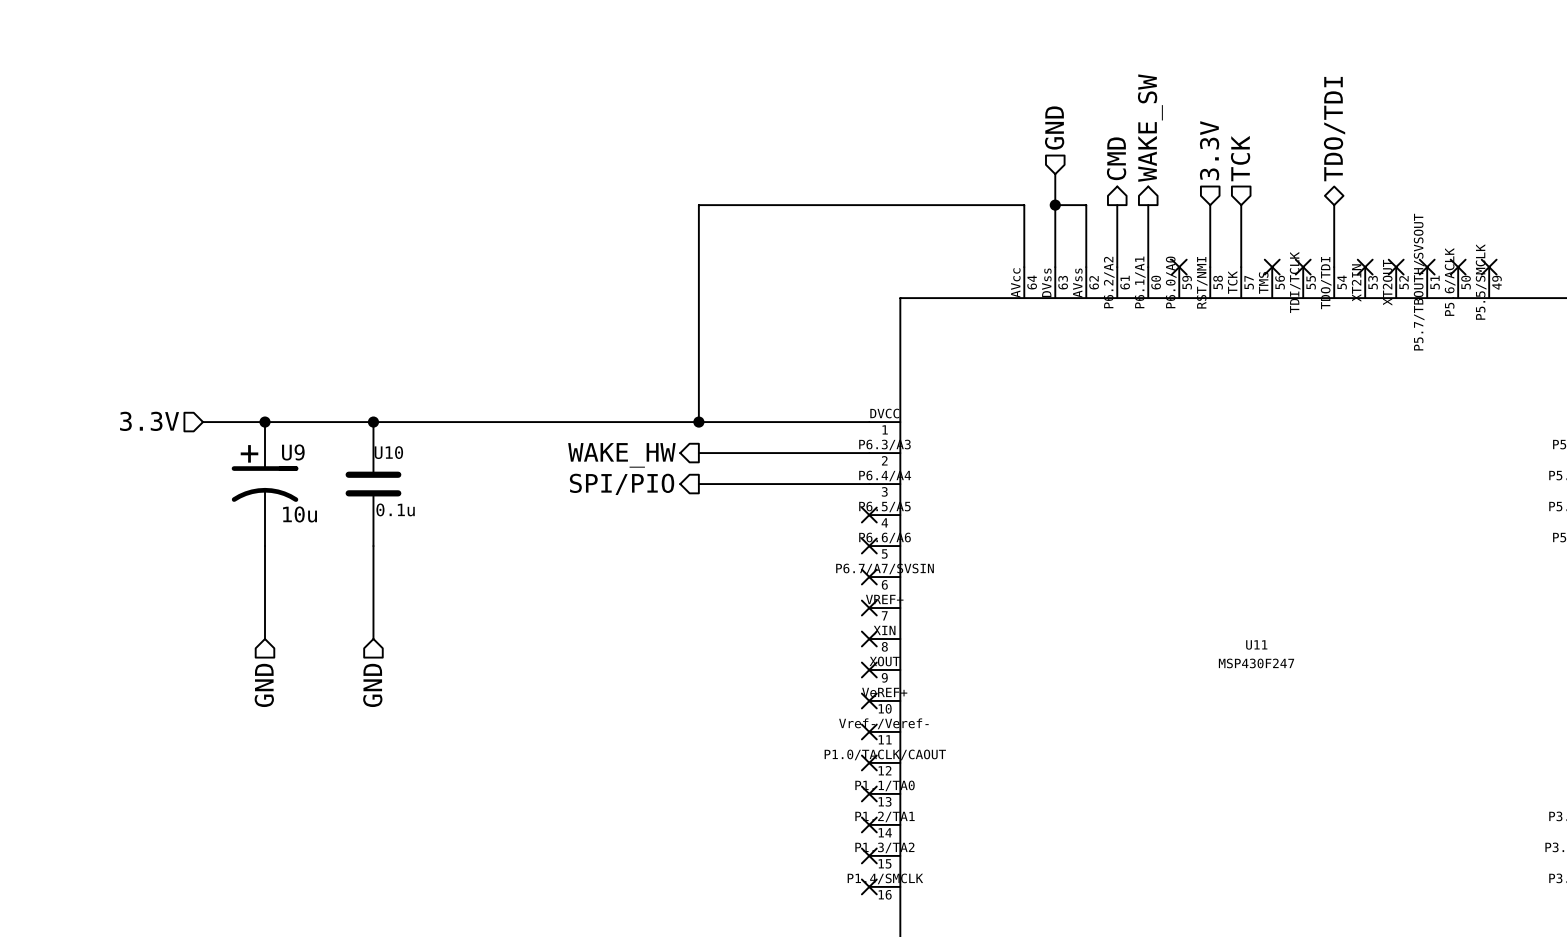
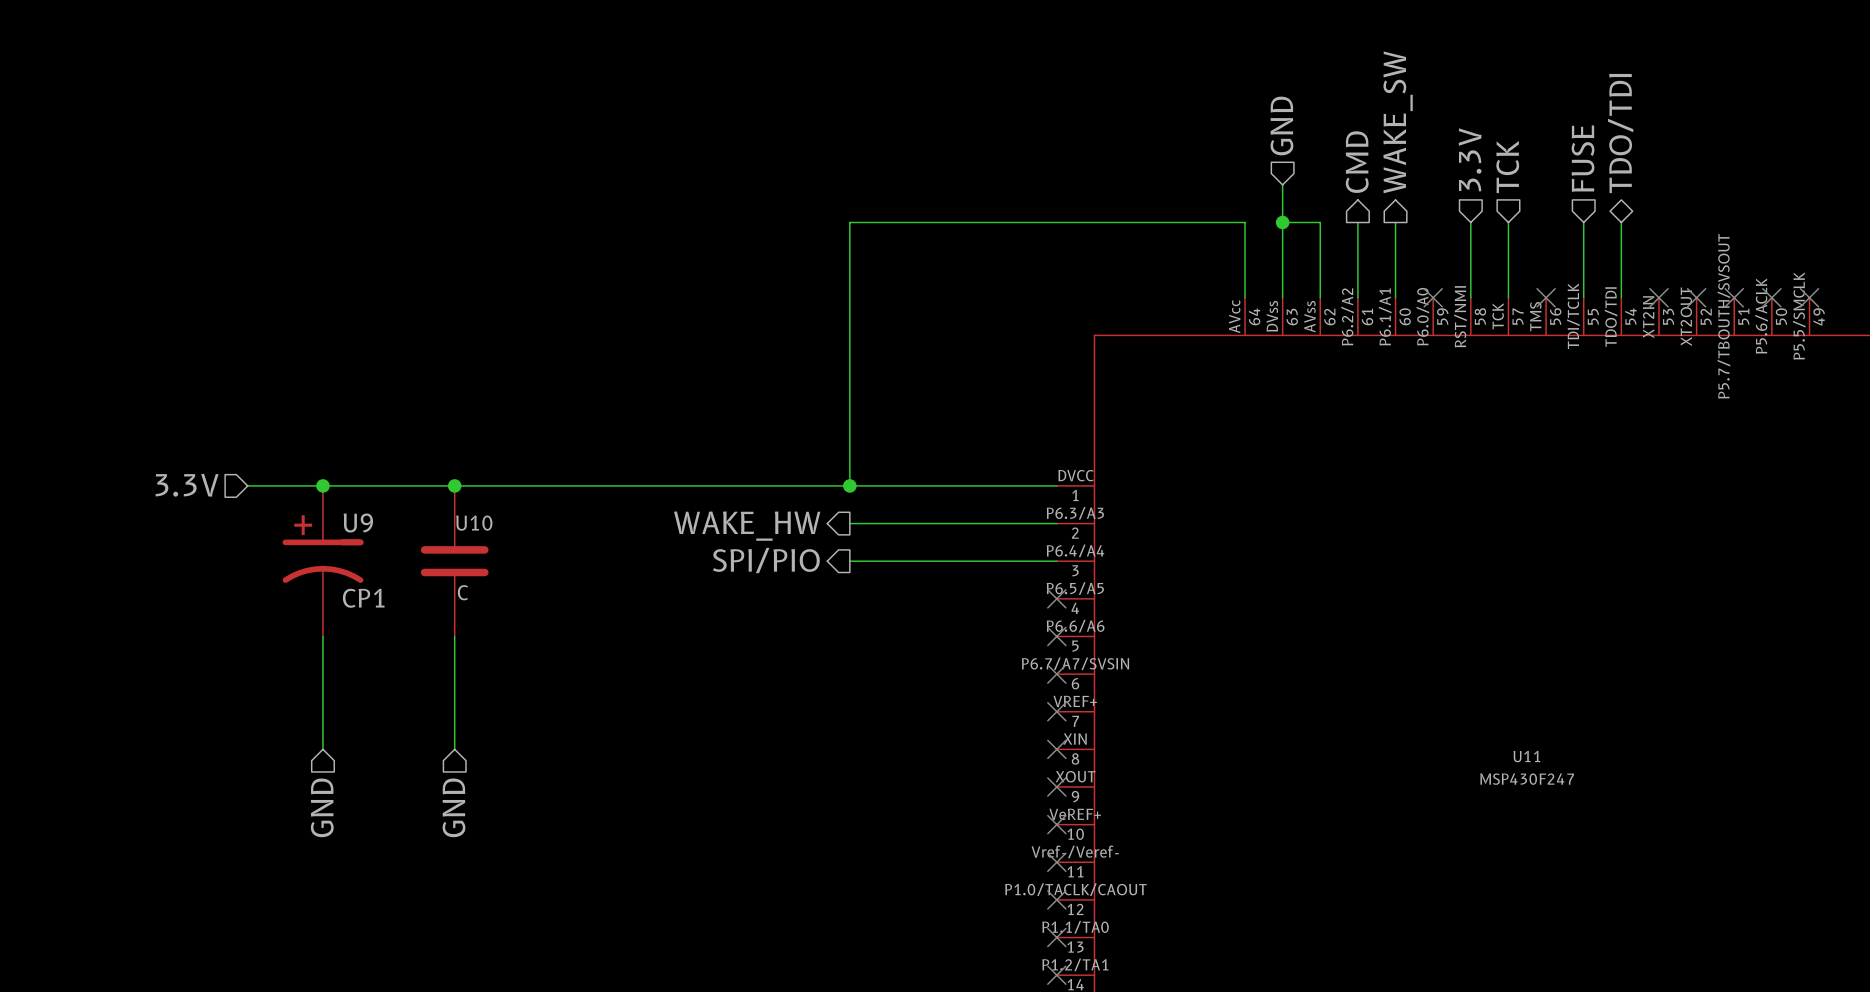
hierarchical label: none -> FUSE (1582, 158)
wire: none -> (1583, 222) (1583, 297)
no-connect mark: (1303, 267) -> none
U10 value: 0.1u (395, 509) -> C (462, 592)
U9 value: 10u (300, 514) -> CP1 (363, 598)

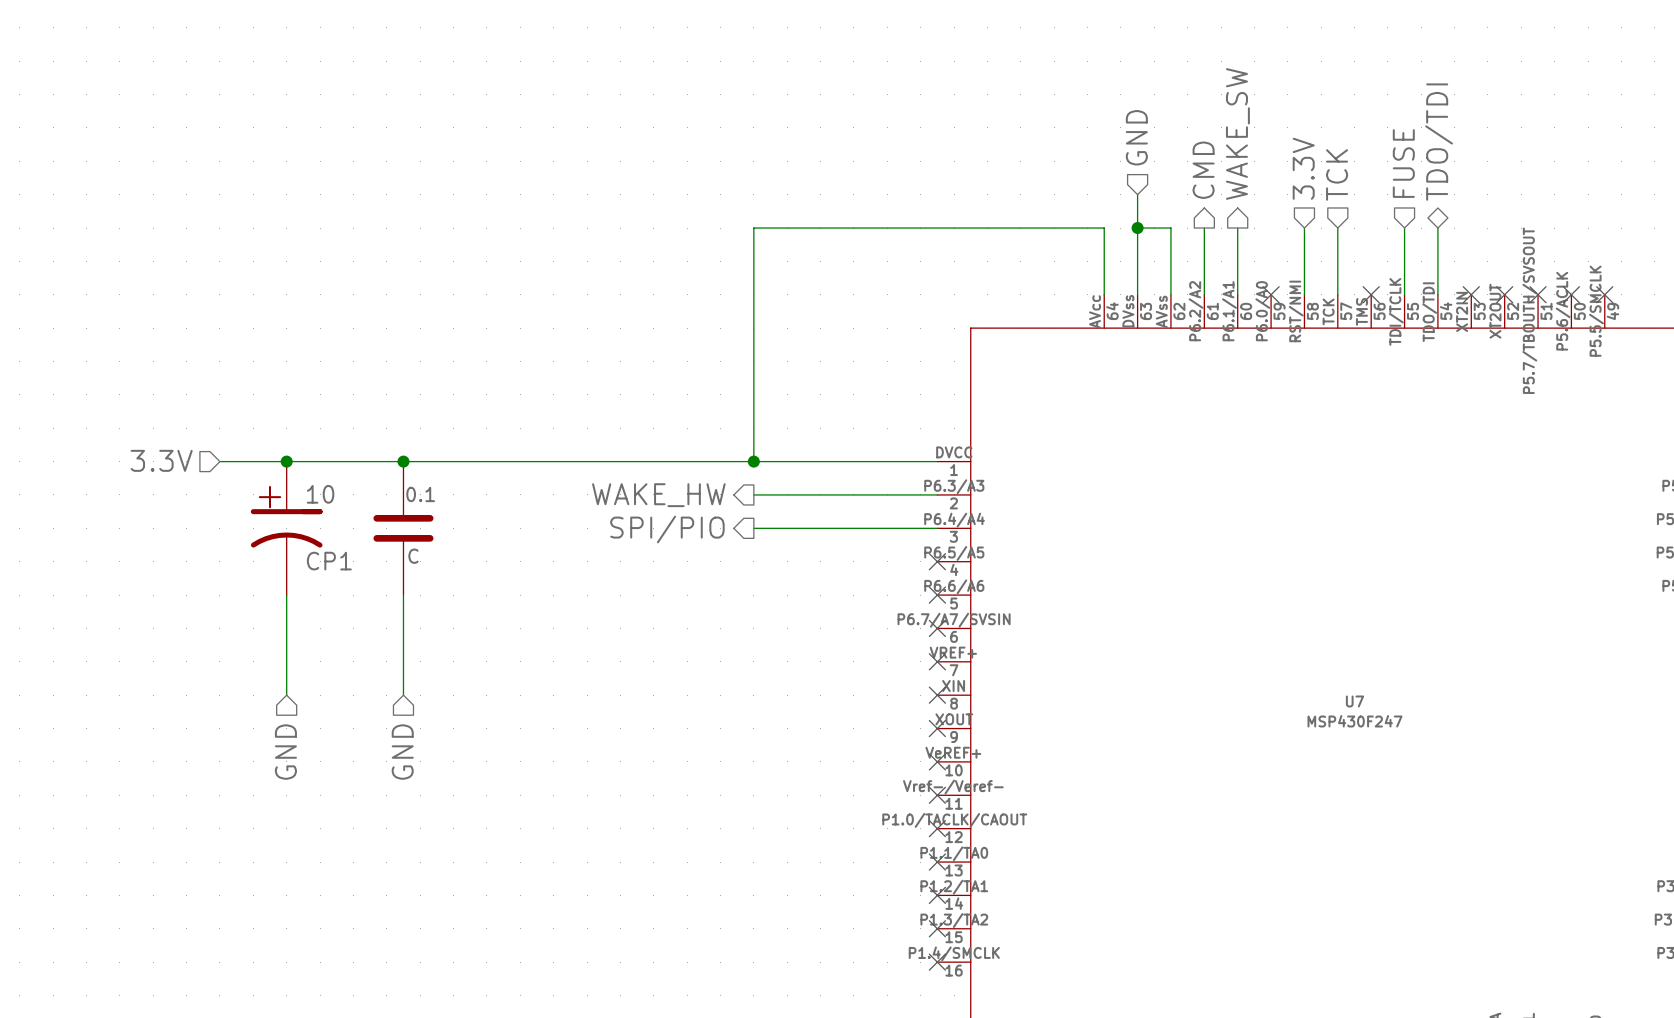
U9 name: U9 (358, 522) -> 10 (320, 494)
U10 name: U10 (474, 523) -> 0.1 (420, 494)
U11 name: U11 (1526, 756) -> U7 (1354, 701)

